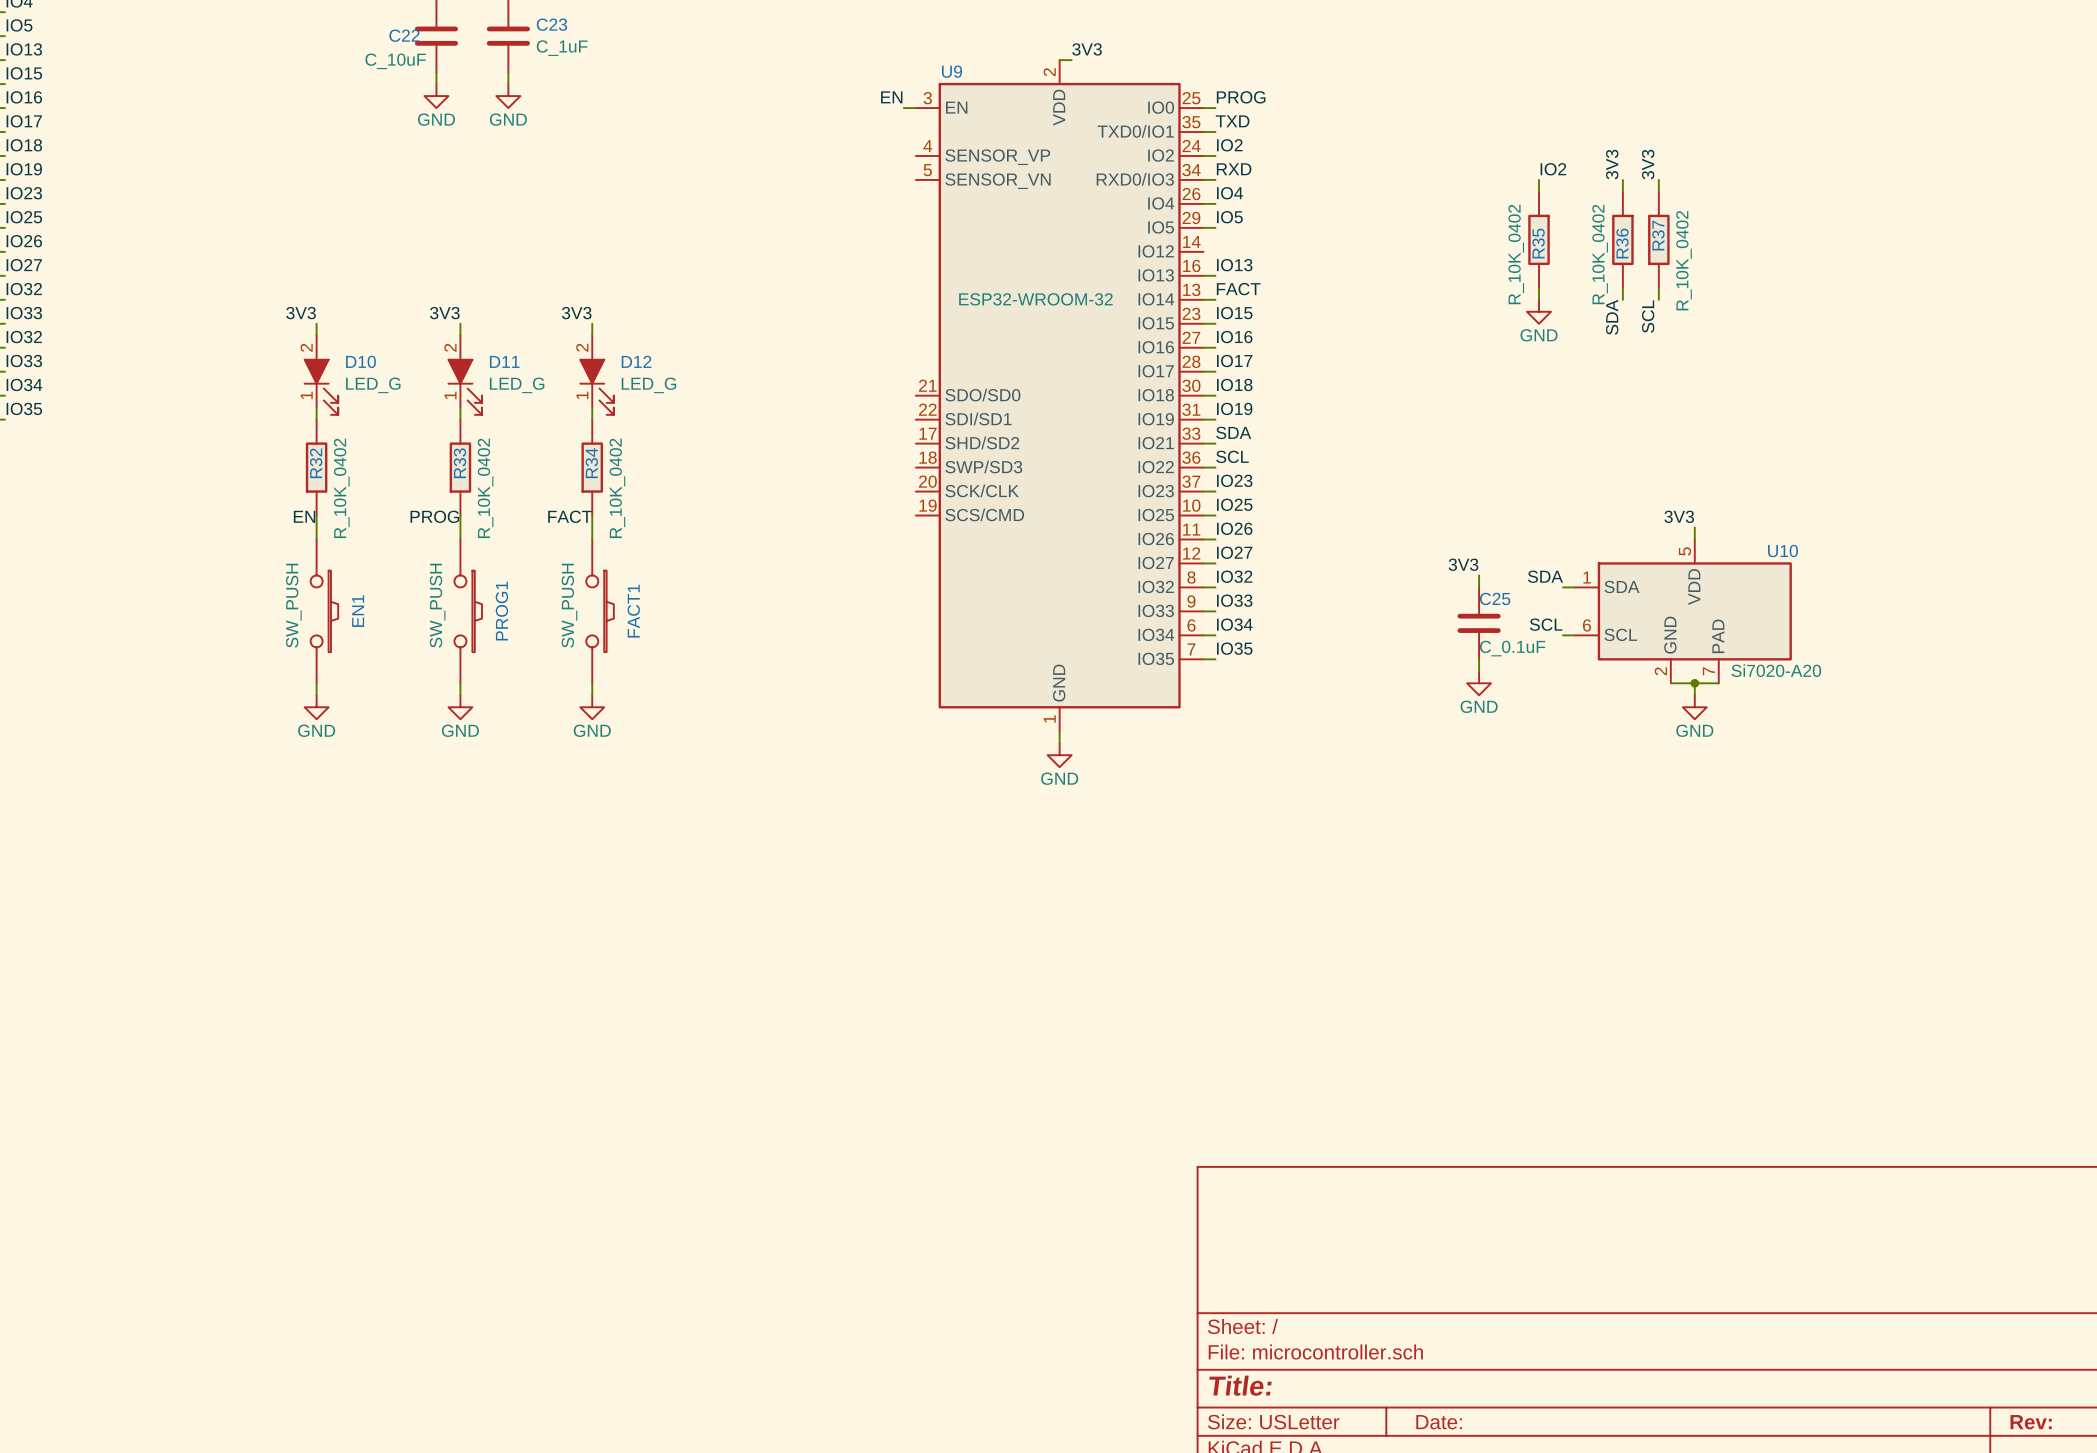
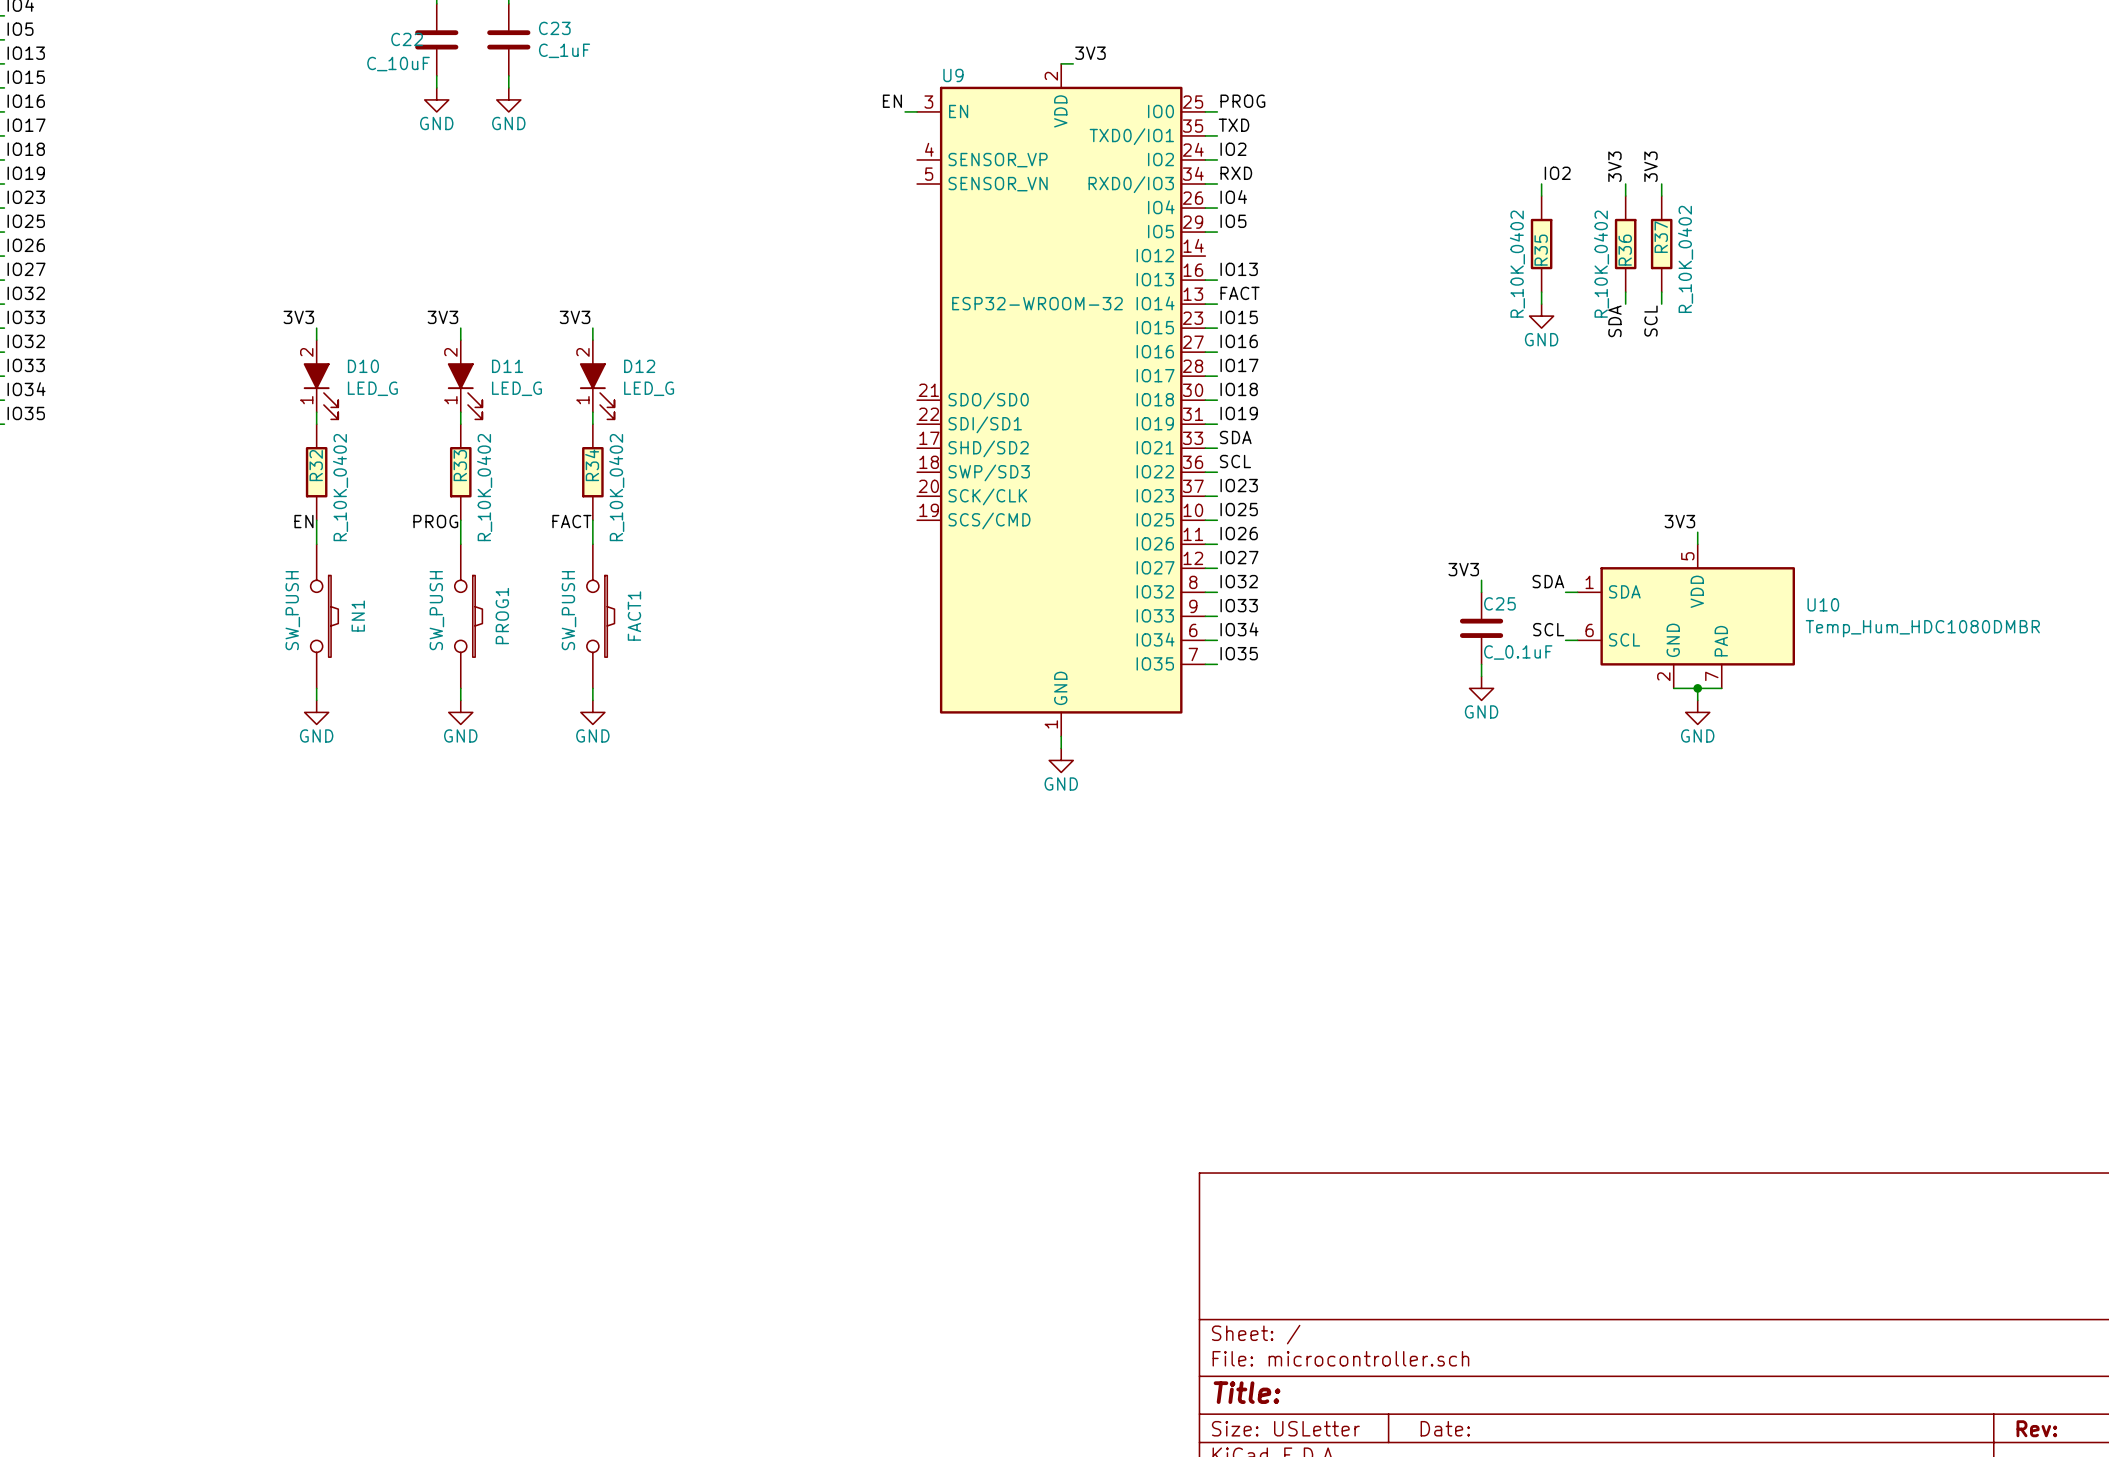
U10 name position: U10 (1783, 551) -> U10 (1823, 604)
U10 value: Si7020-A20 (1776, 670) -> Temp_Hum_HDC1080DMBR (1922, 628)

